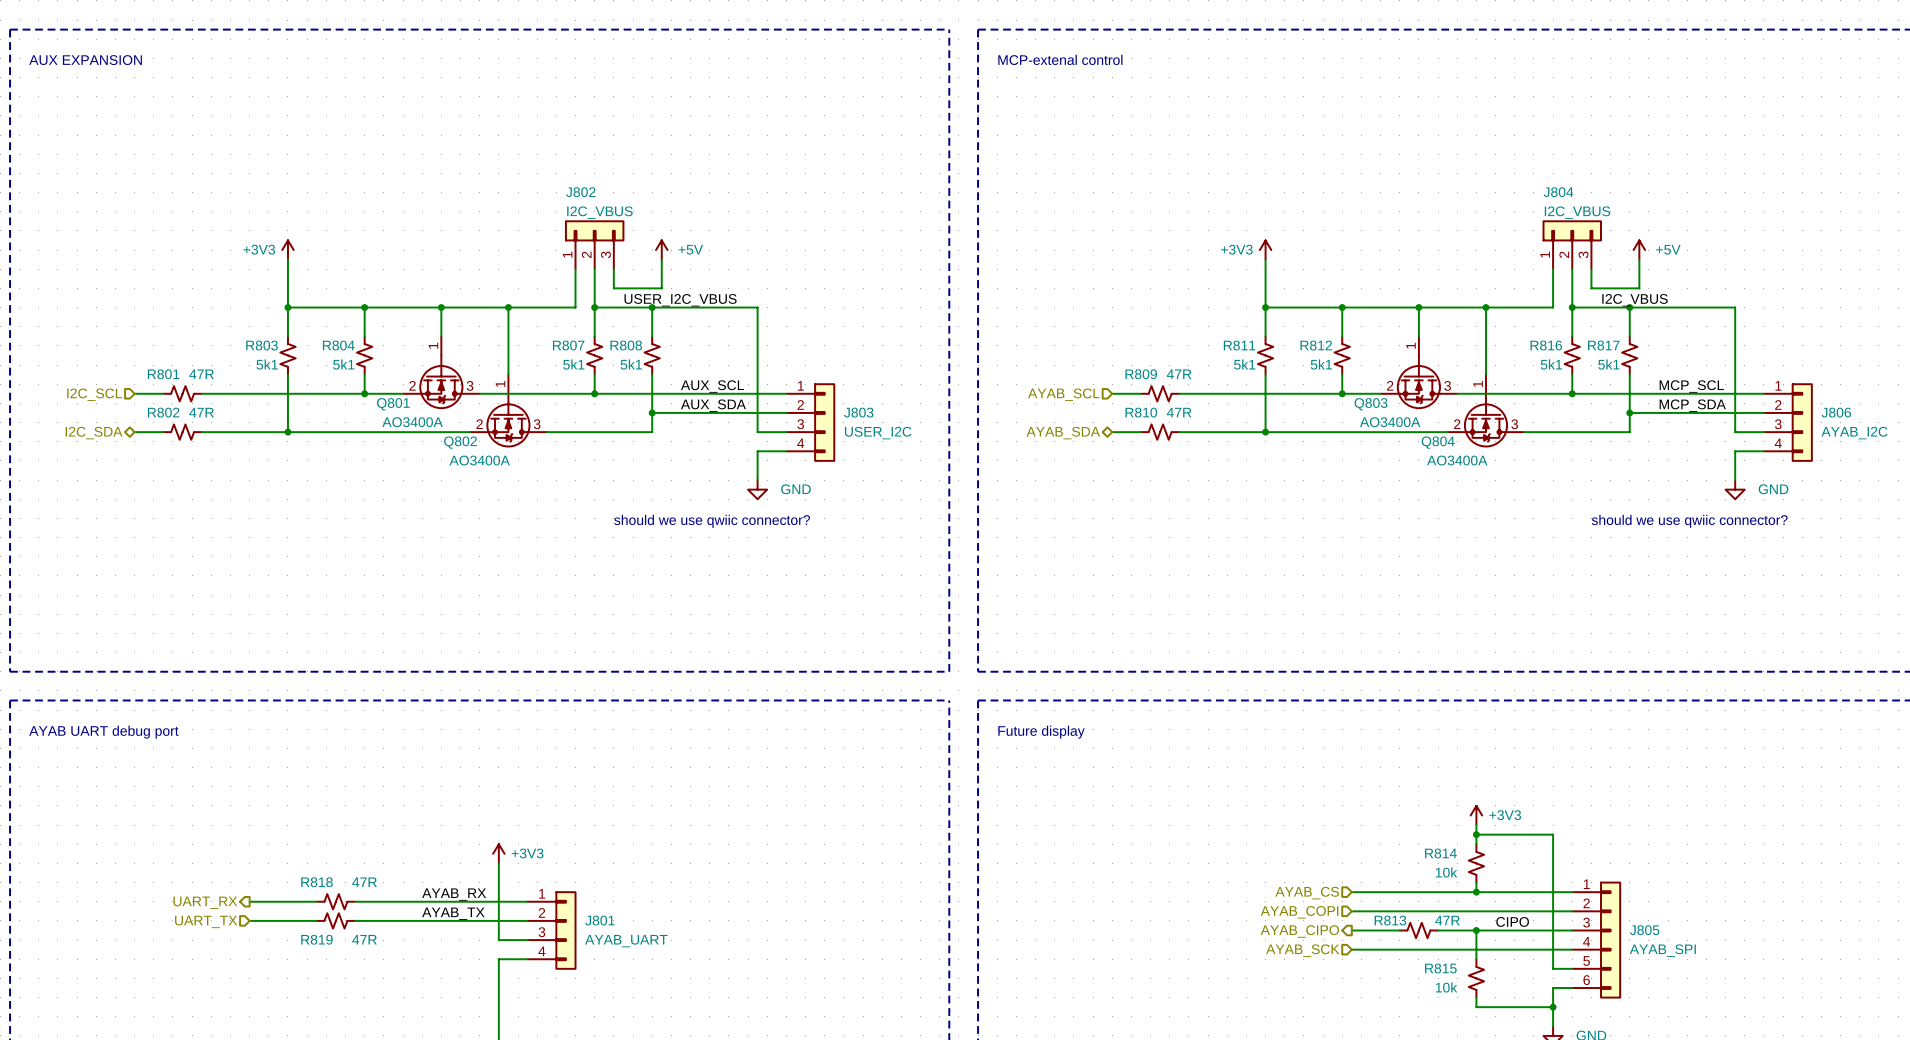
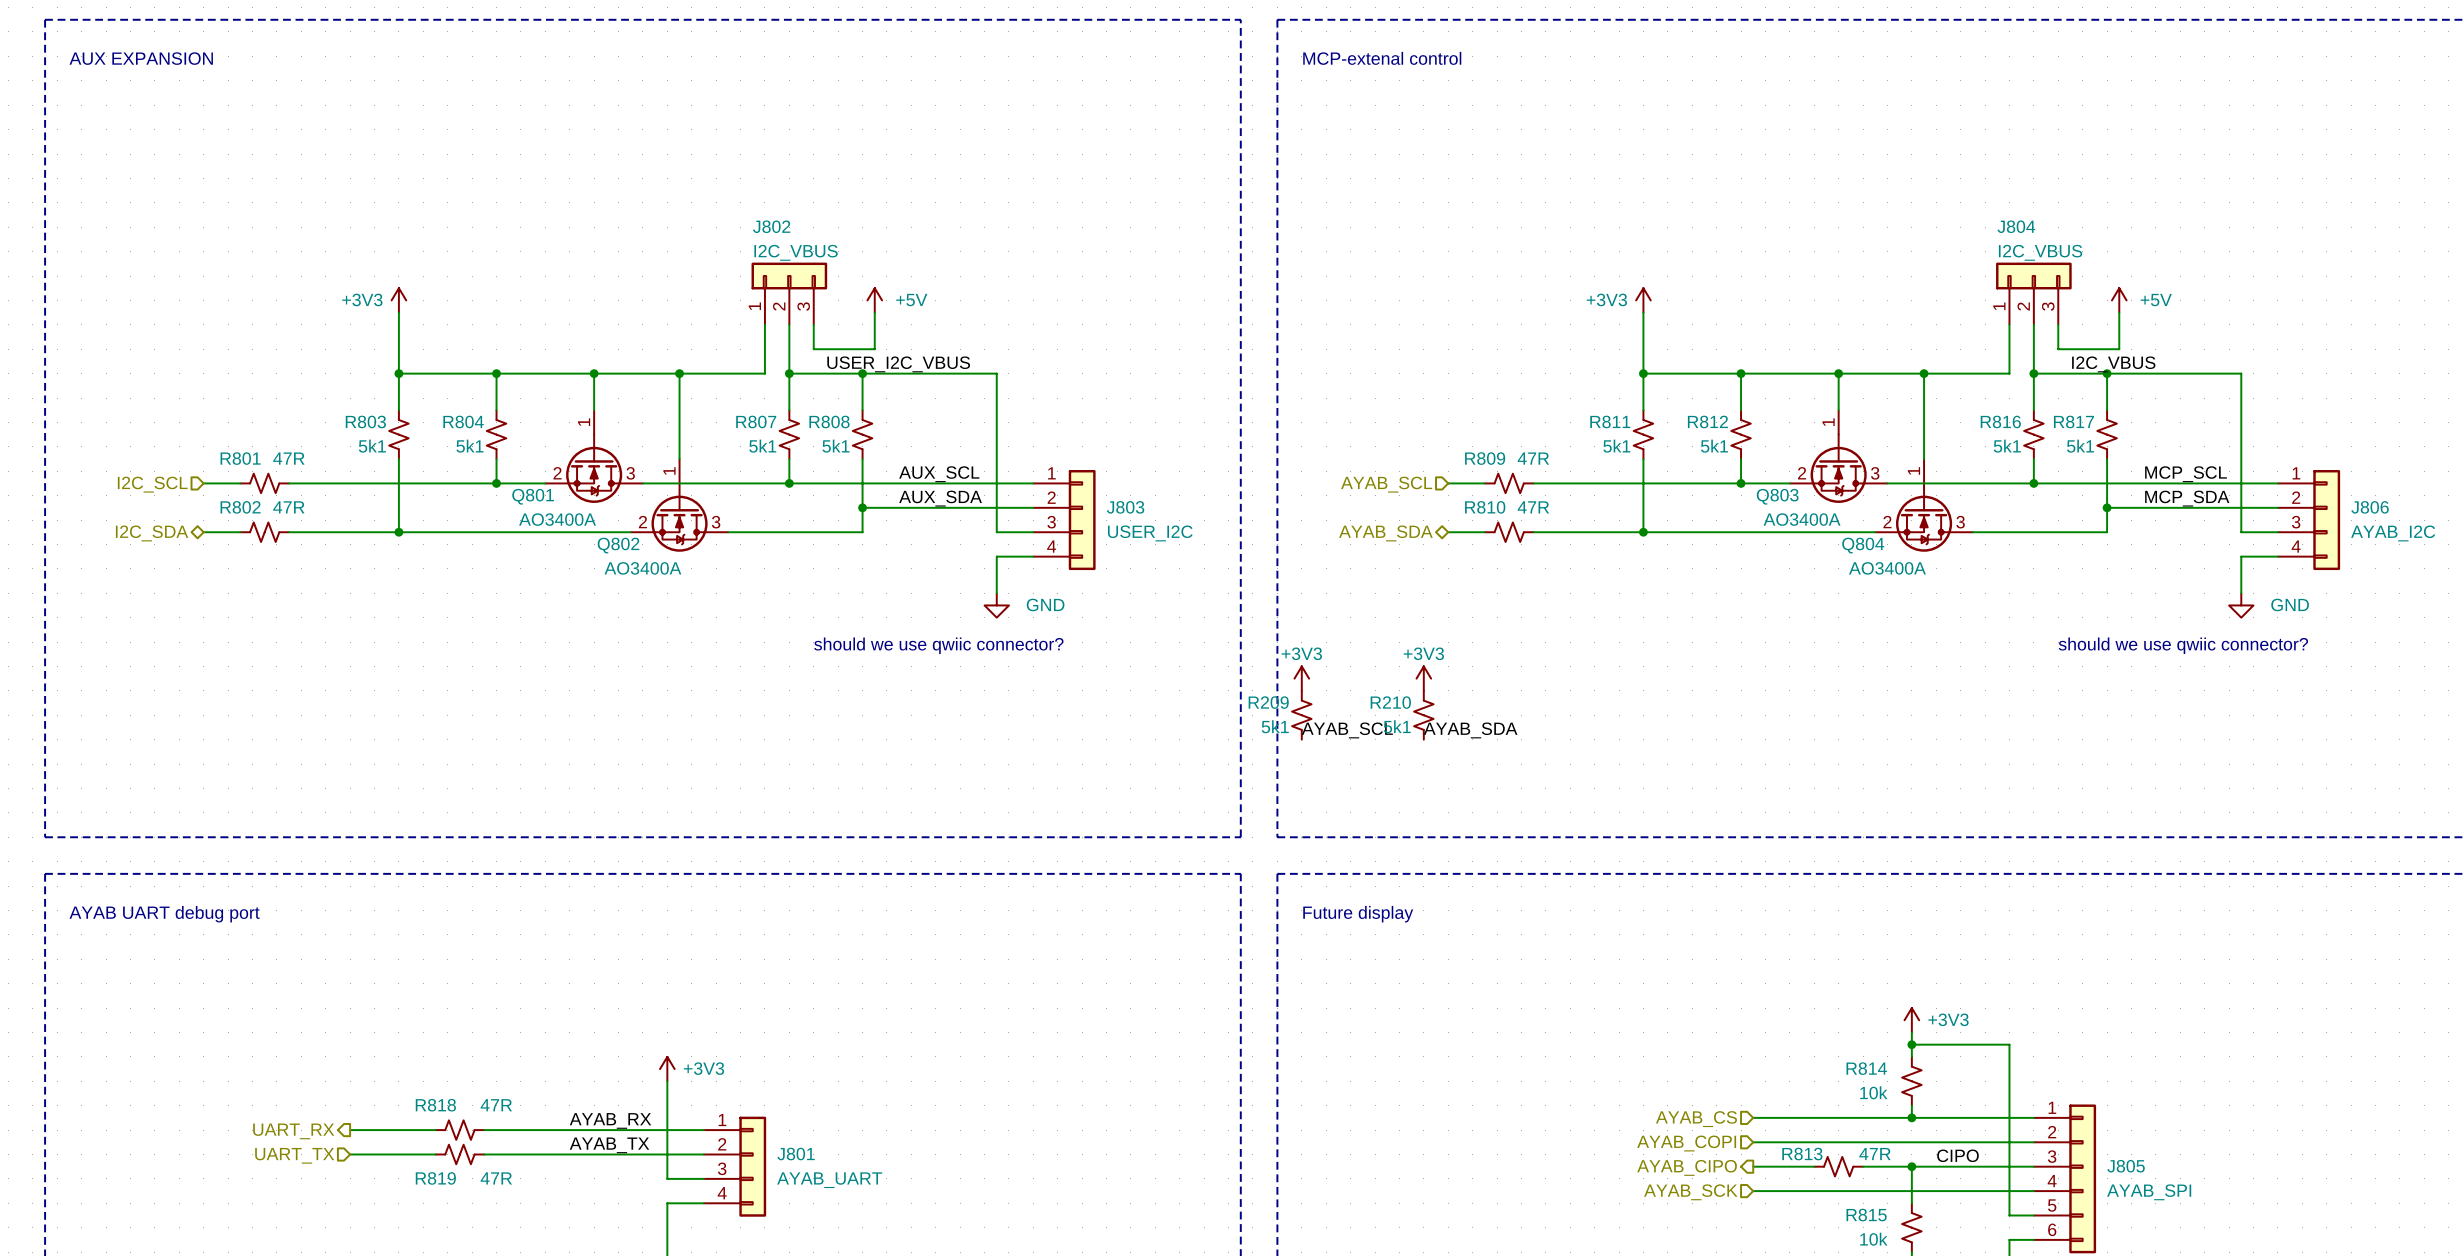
power symbol: none -> +3V3 (1301, 678)
power symbol: none -> +3V3 (1423, 678)
R209: none -> 5k1 (1301, 715)
R210: none -> 5k1 (1423, 715)
label: none -> AYAB_SCL (1347, 730)
label: none -> AYAB_SDA (1470, 730)

